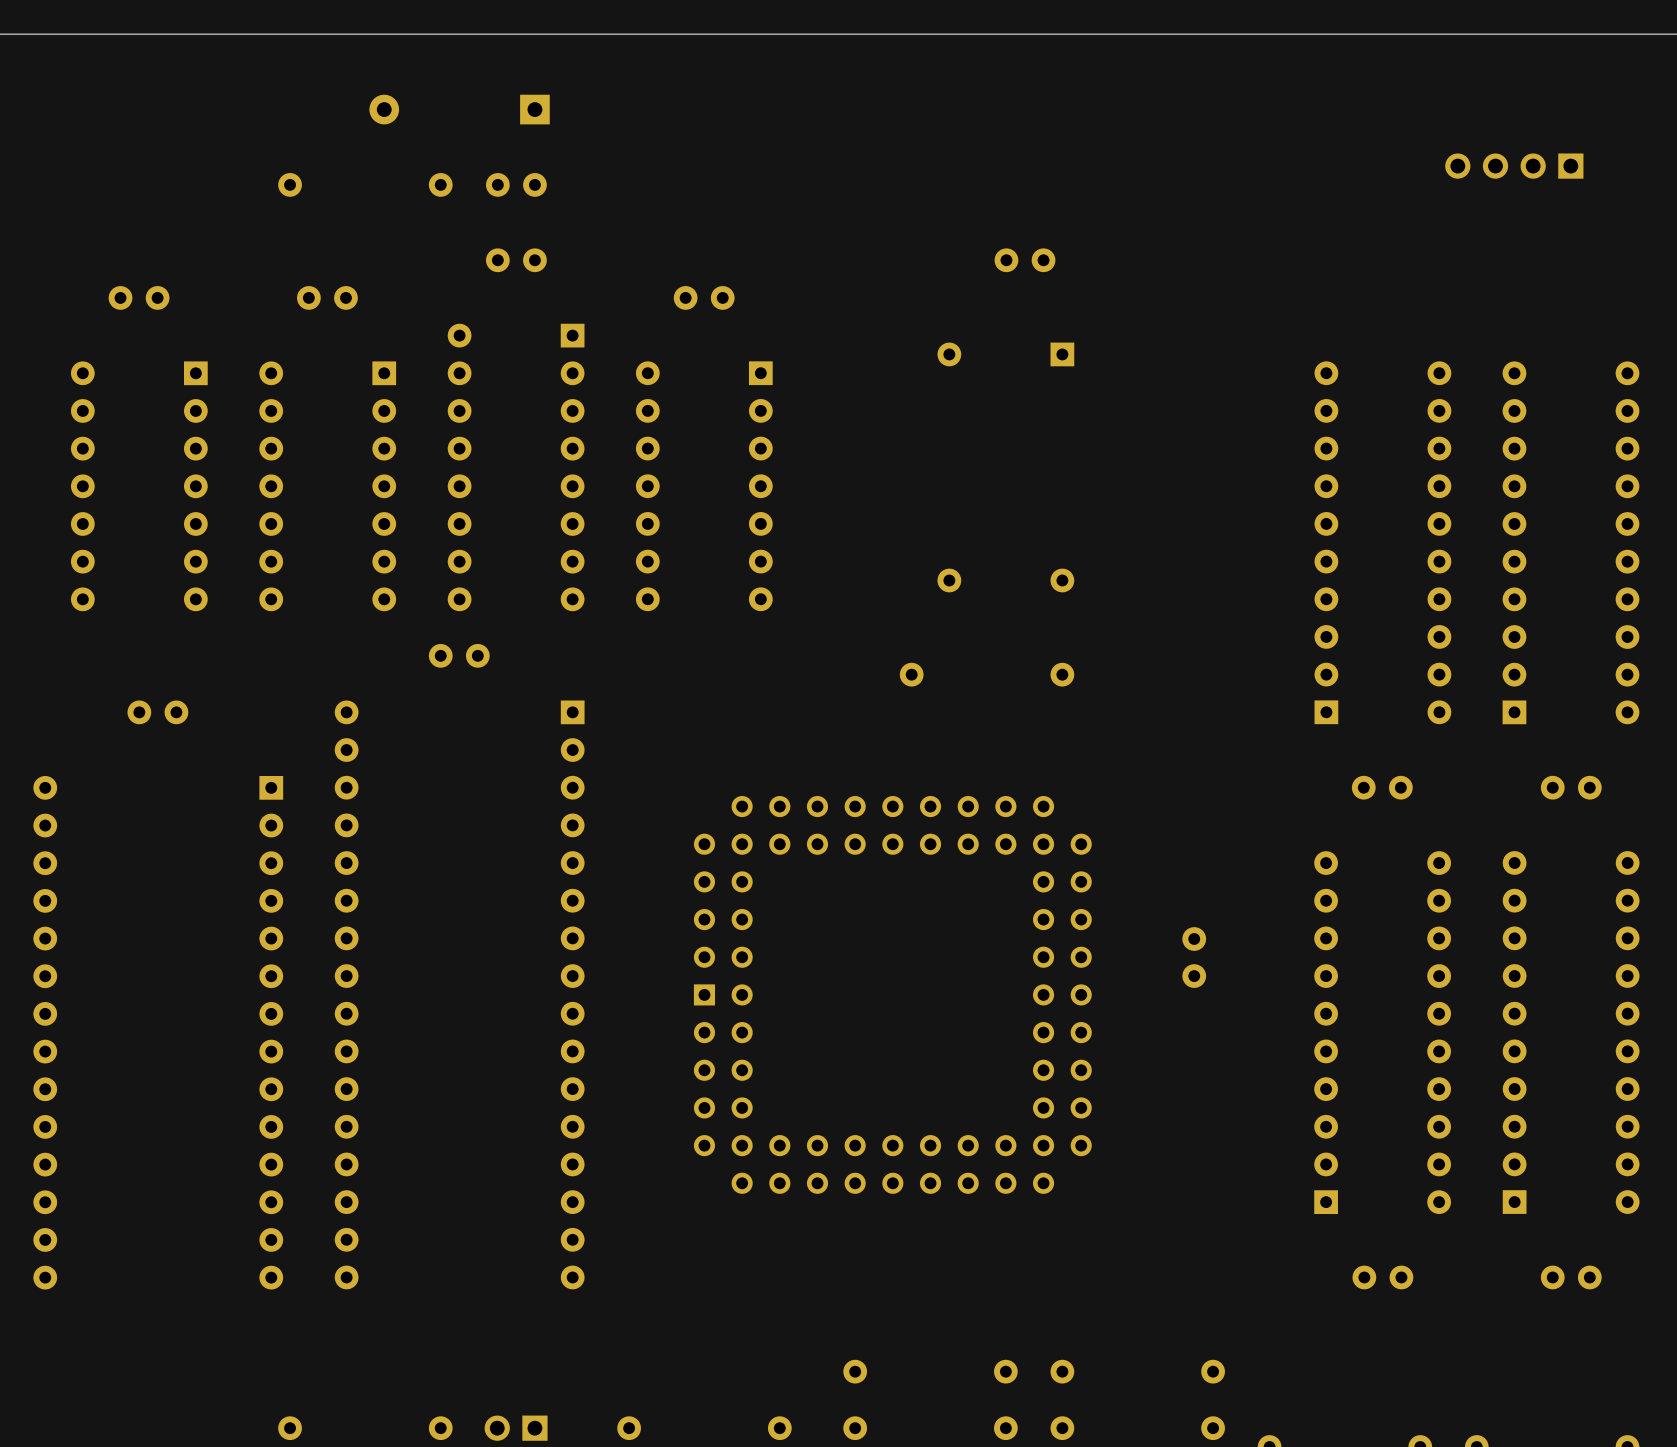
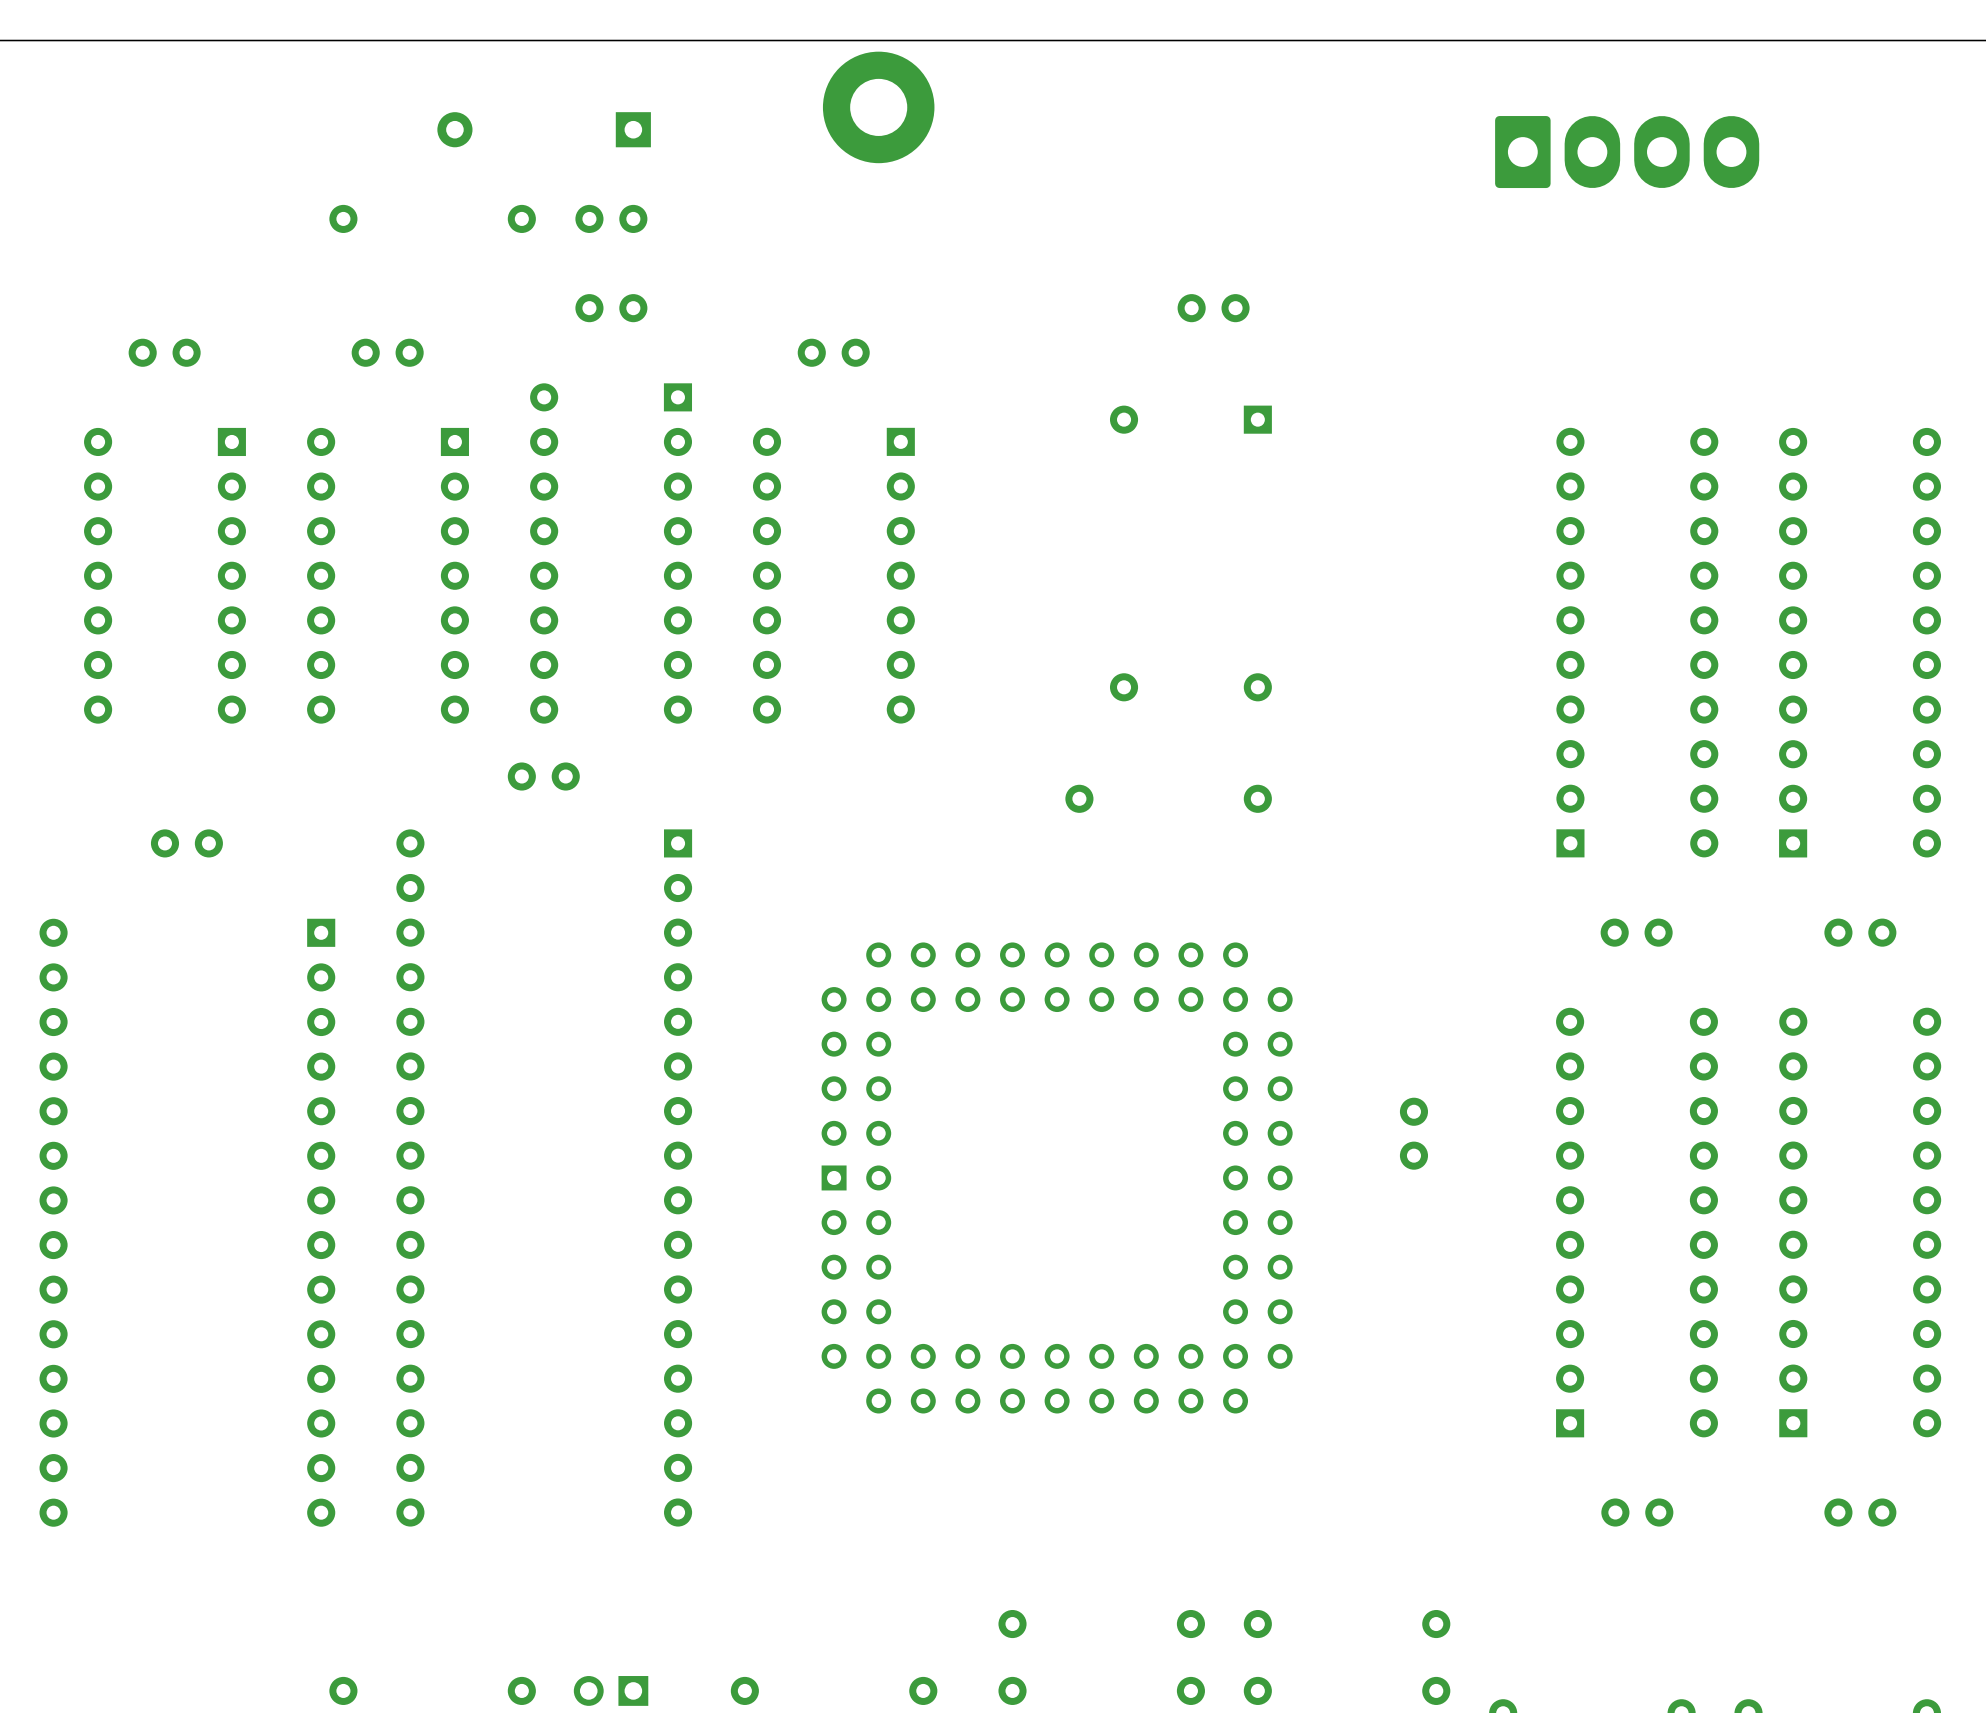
part: none -> (878, 107)
part: none -> (1627, 152)
part: (1514, 166) -> none

